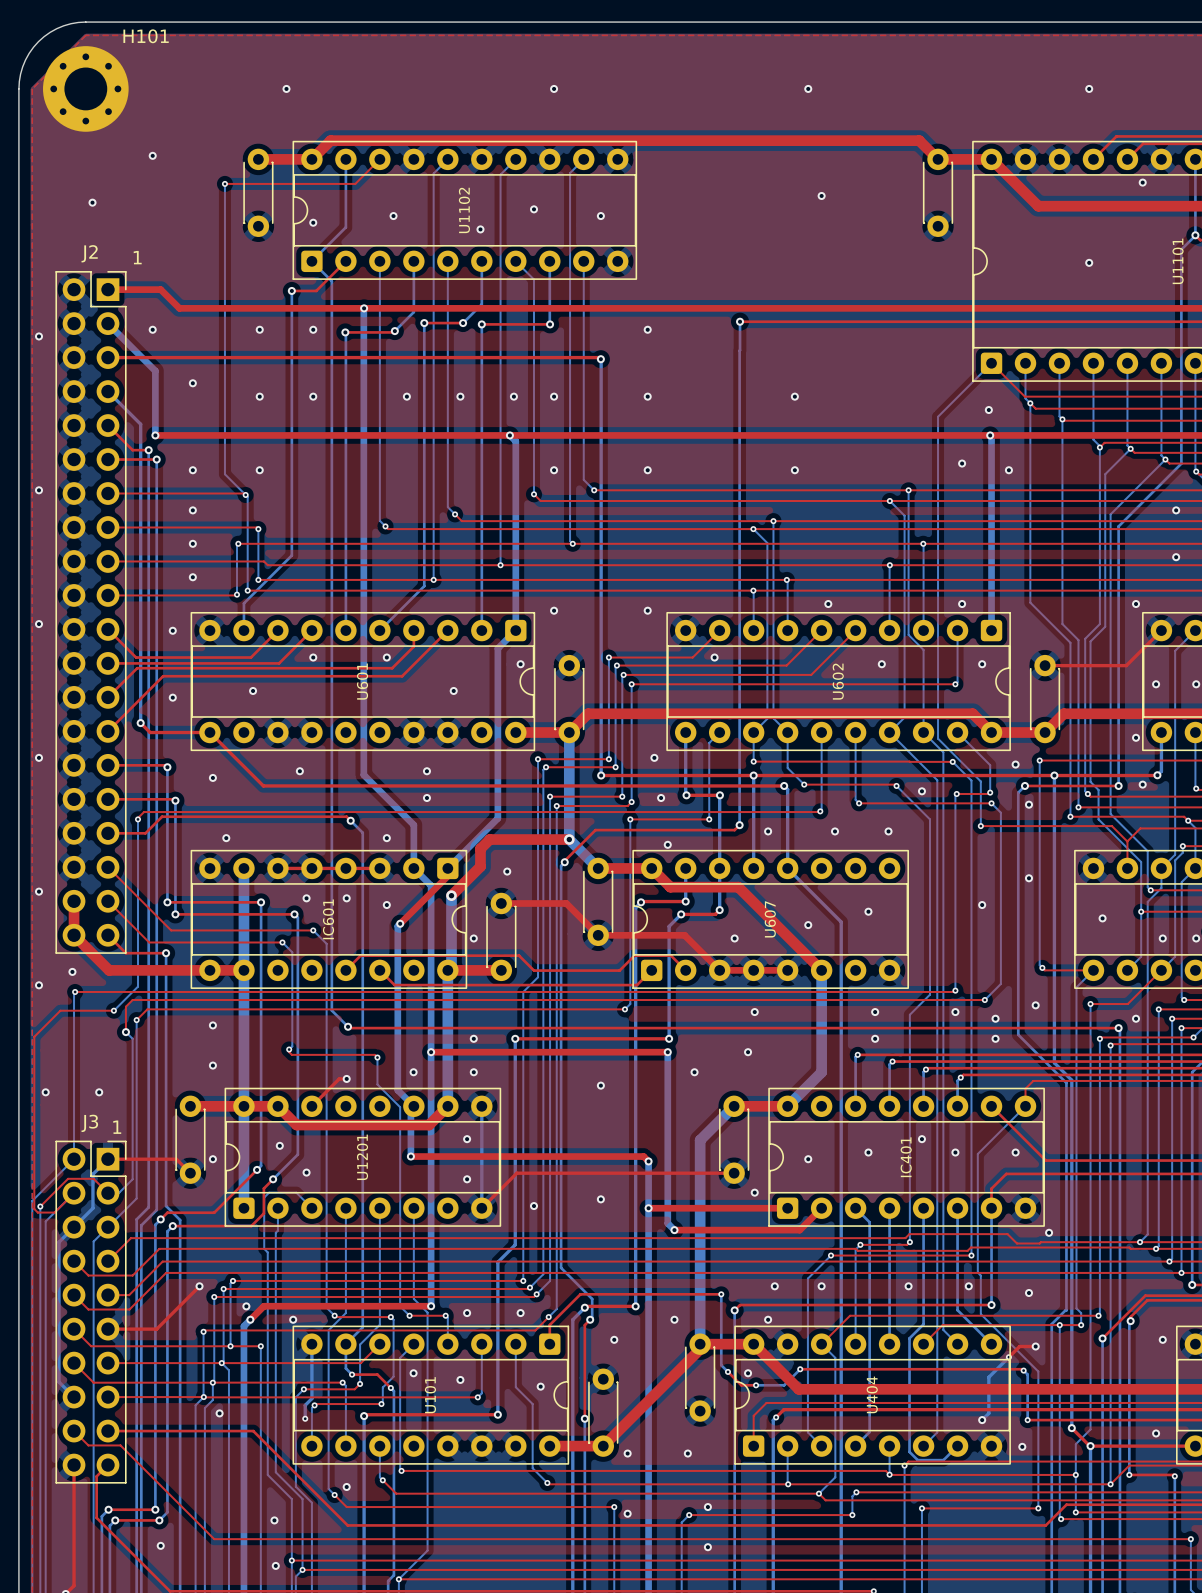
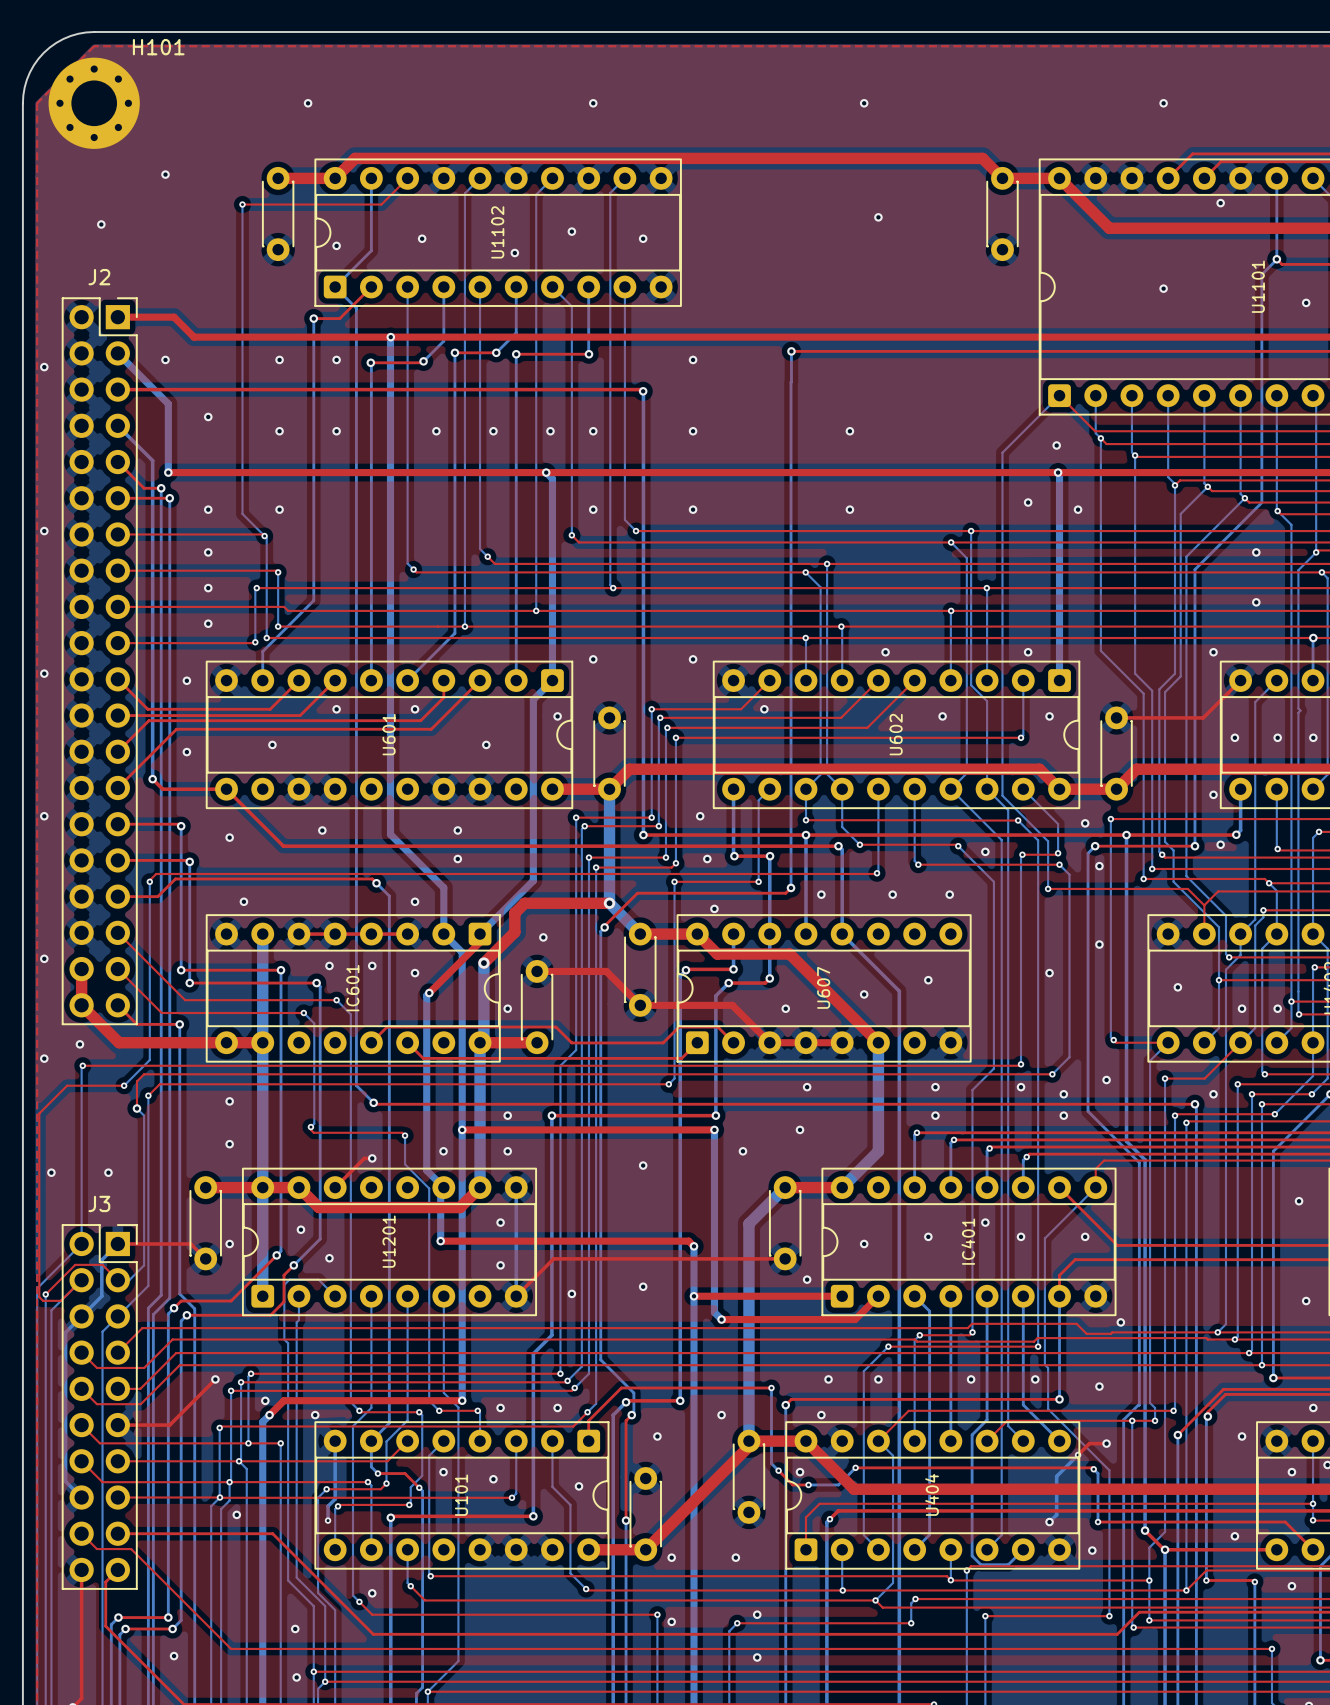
text: 1 (137, 257) -> none
text: 1 (117, 1127) -> none

